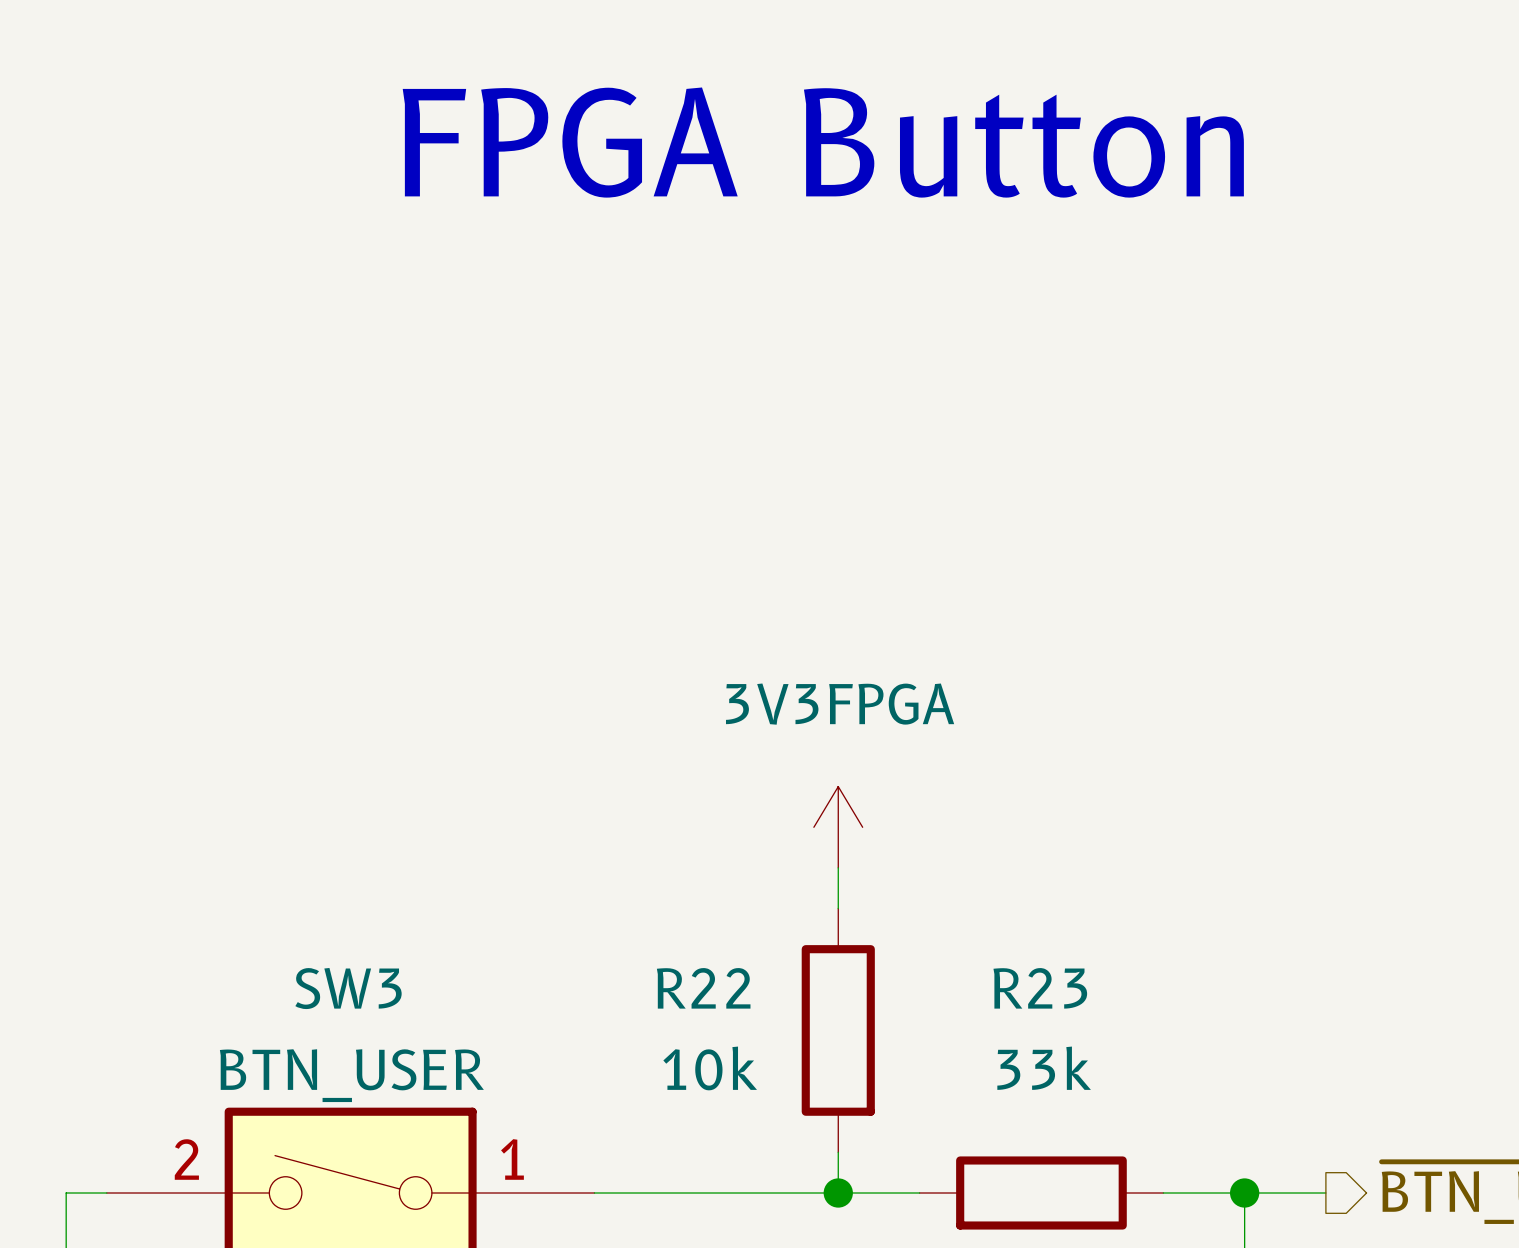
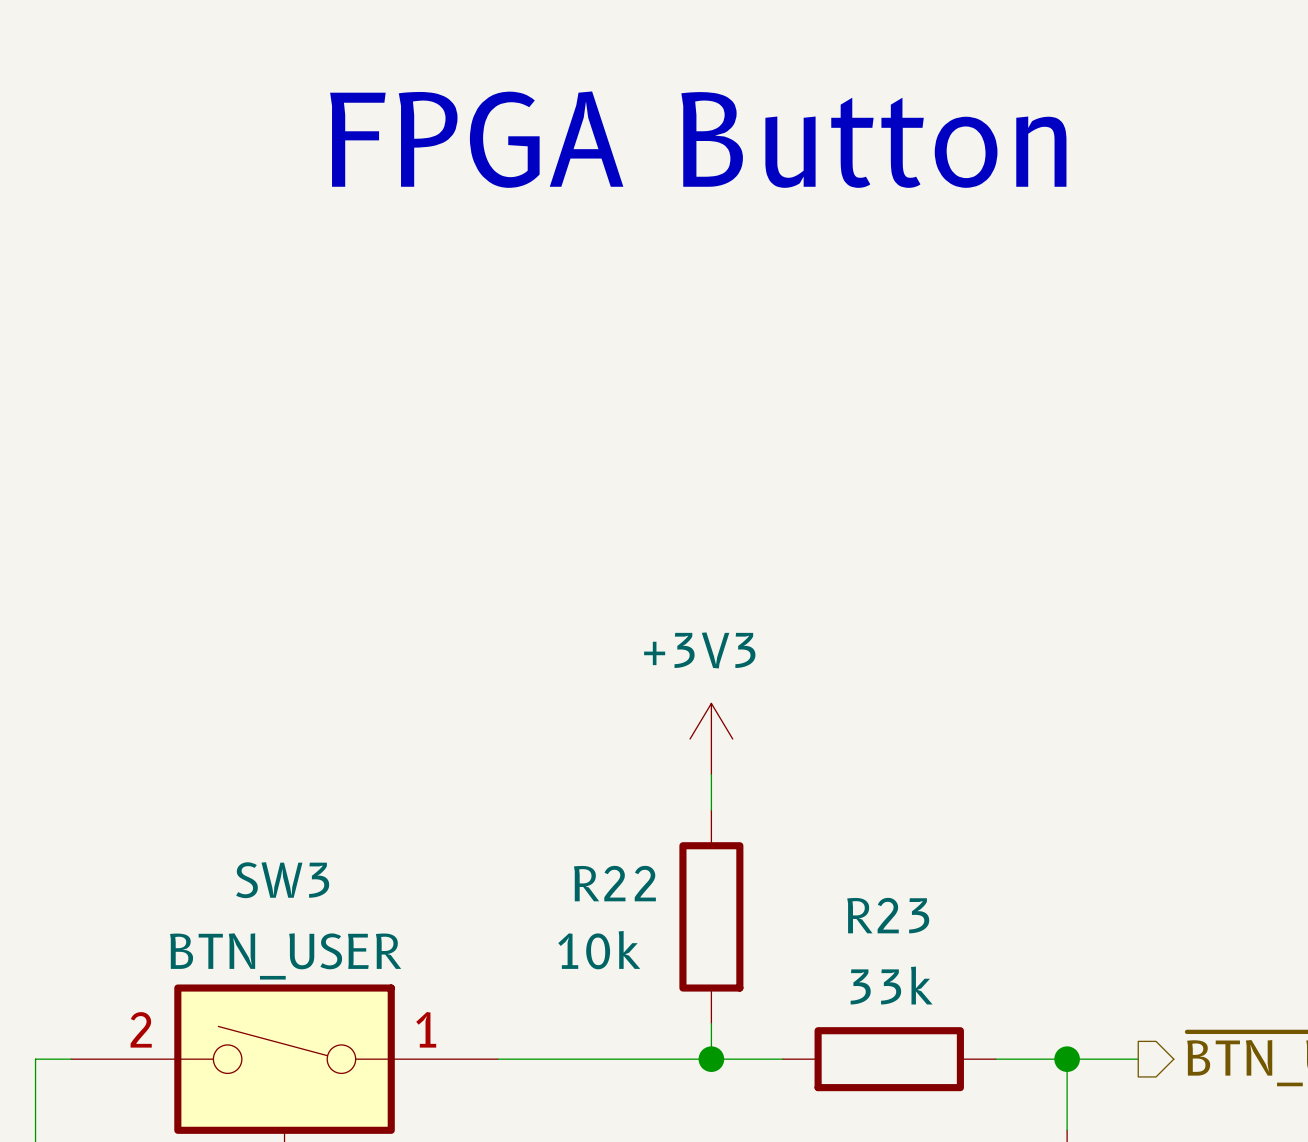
power symbol: 3V3FPGA (838, 827) -> +3V3 (711, 739)
R22 name position: R22 (703, 988) -> R22 (614, 883)
R23 name position: R23 (1040, 988) -> R23 (888, 915)
R23 value position: 33k (1044, 1068) -> 33k (891, 985)

